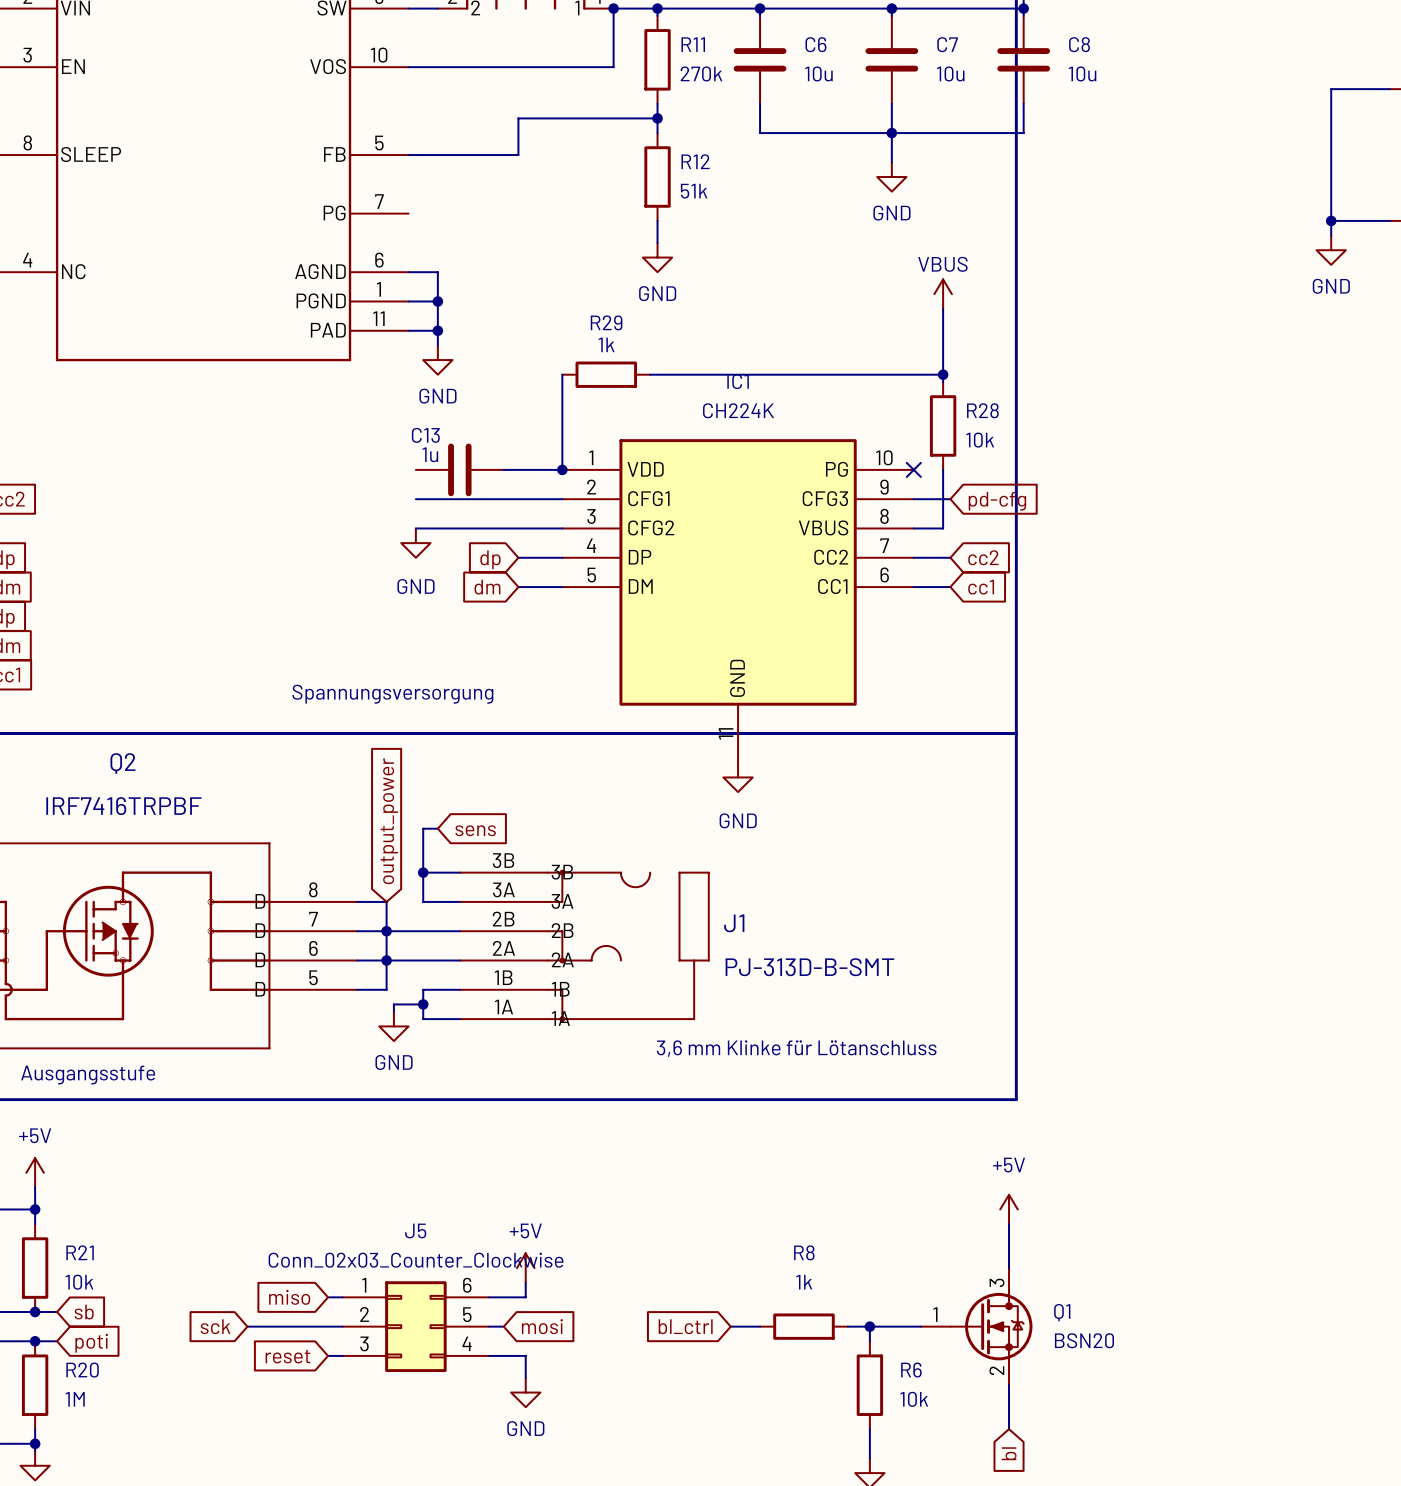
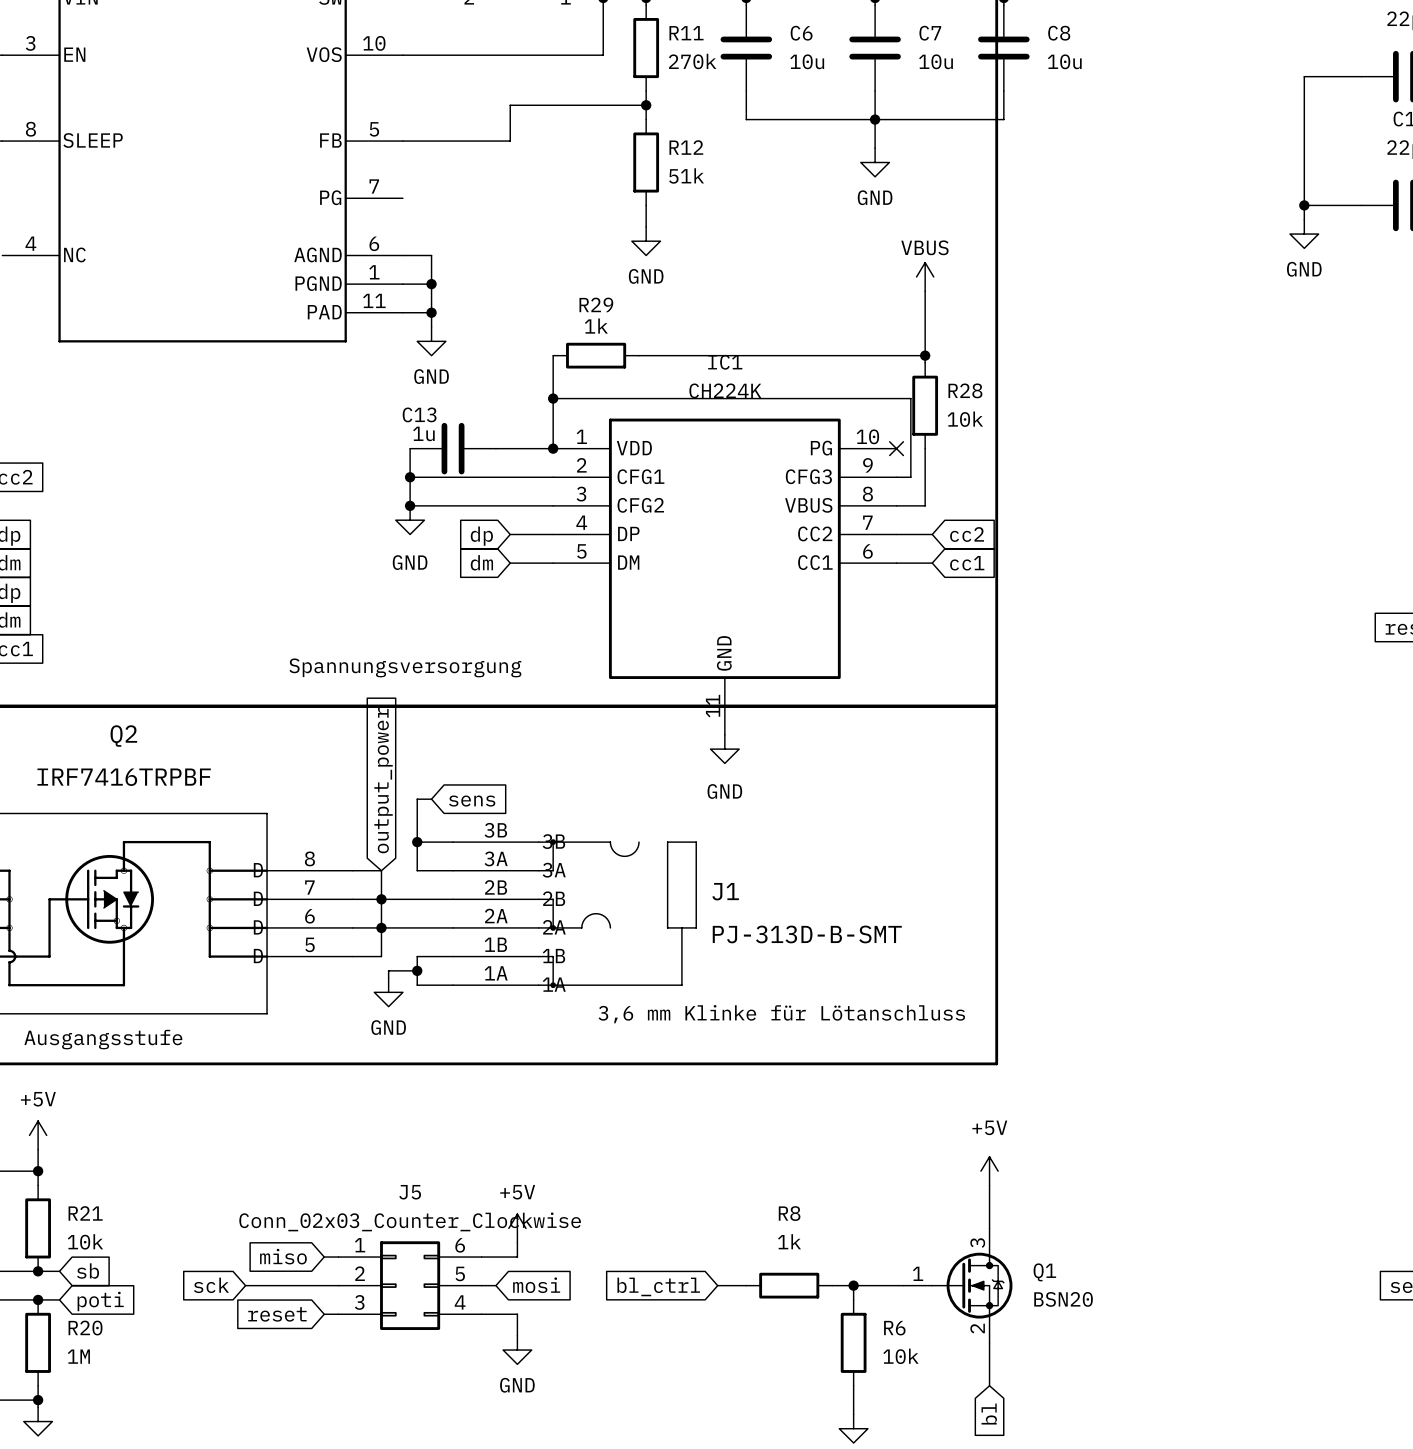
junction: none -> (553, 398)
wire: none -> (410, 448) (410, 505)
junction: none -> (410, 477)
wire: (928, 499) (950, 499) -> (910, 477) (910, 398) (553, 398)
global label: pd-cfg (997, 501) -> none
junction: none -> (410, 505)

